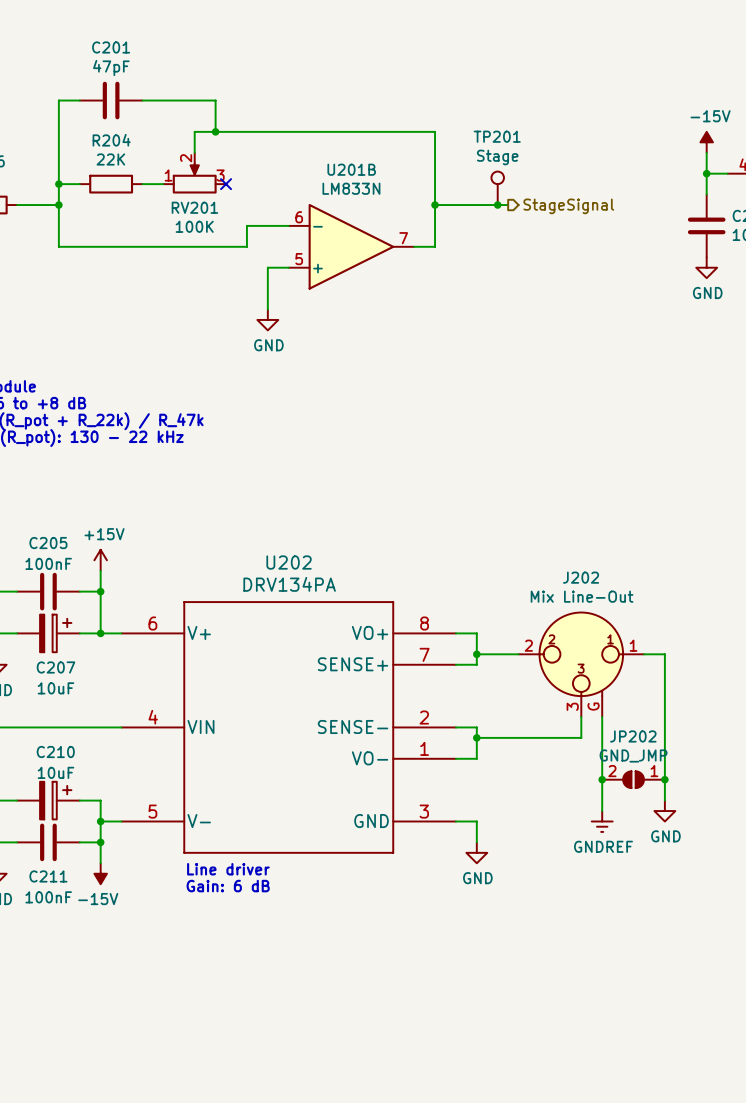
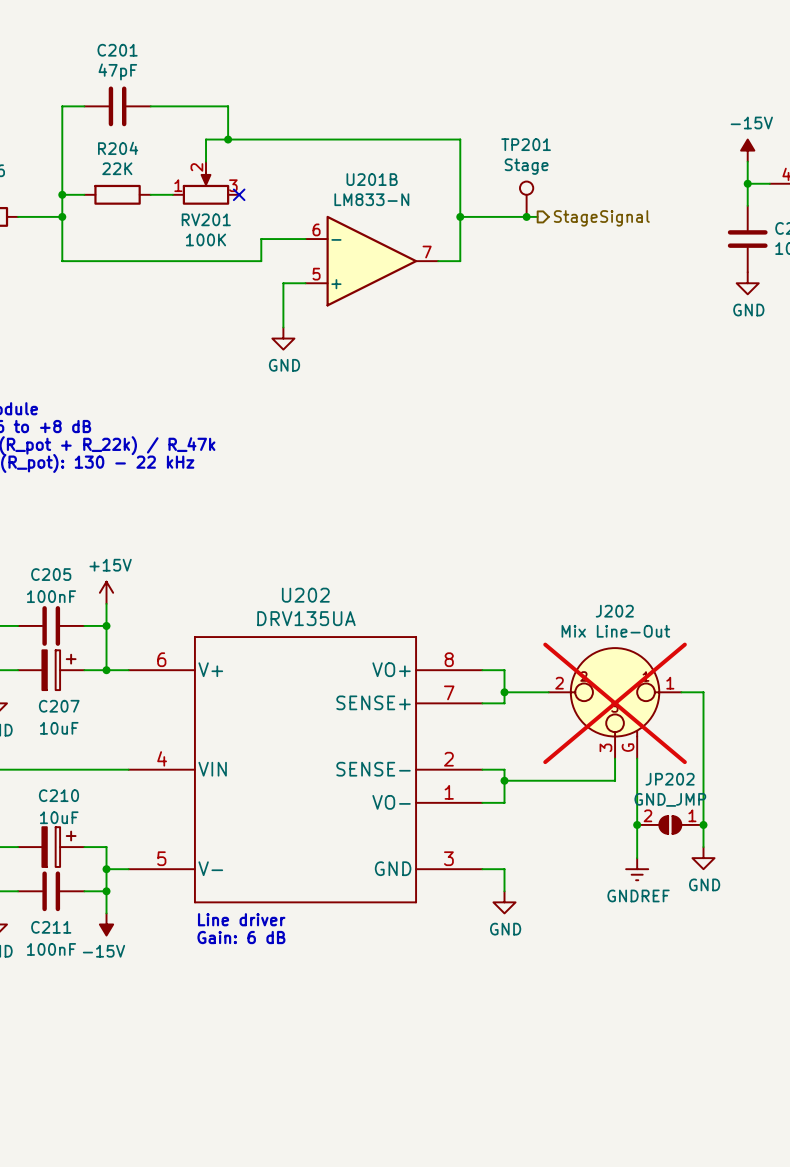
U201B value: LM833N (351, 188) -> LM833-N (371, 199)
U202 value: DRV134PA (289, 584) -> DRV135UA (306, 618)
J202 do-not-place cross: none -> (615, 703)

